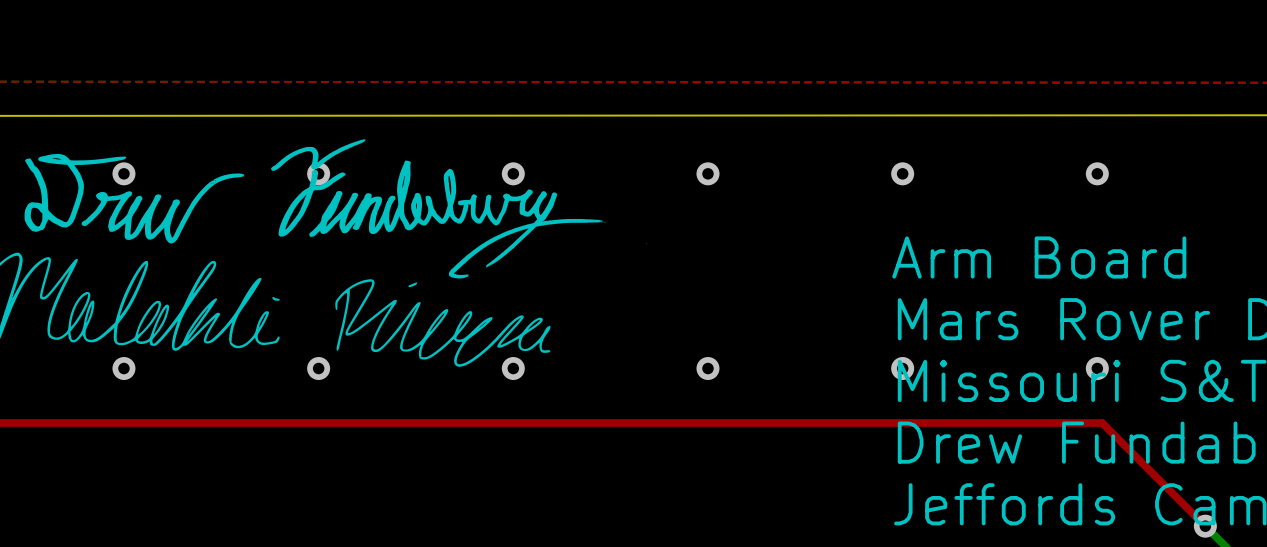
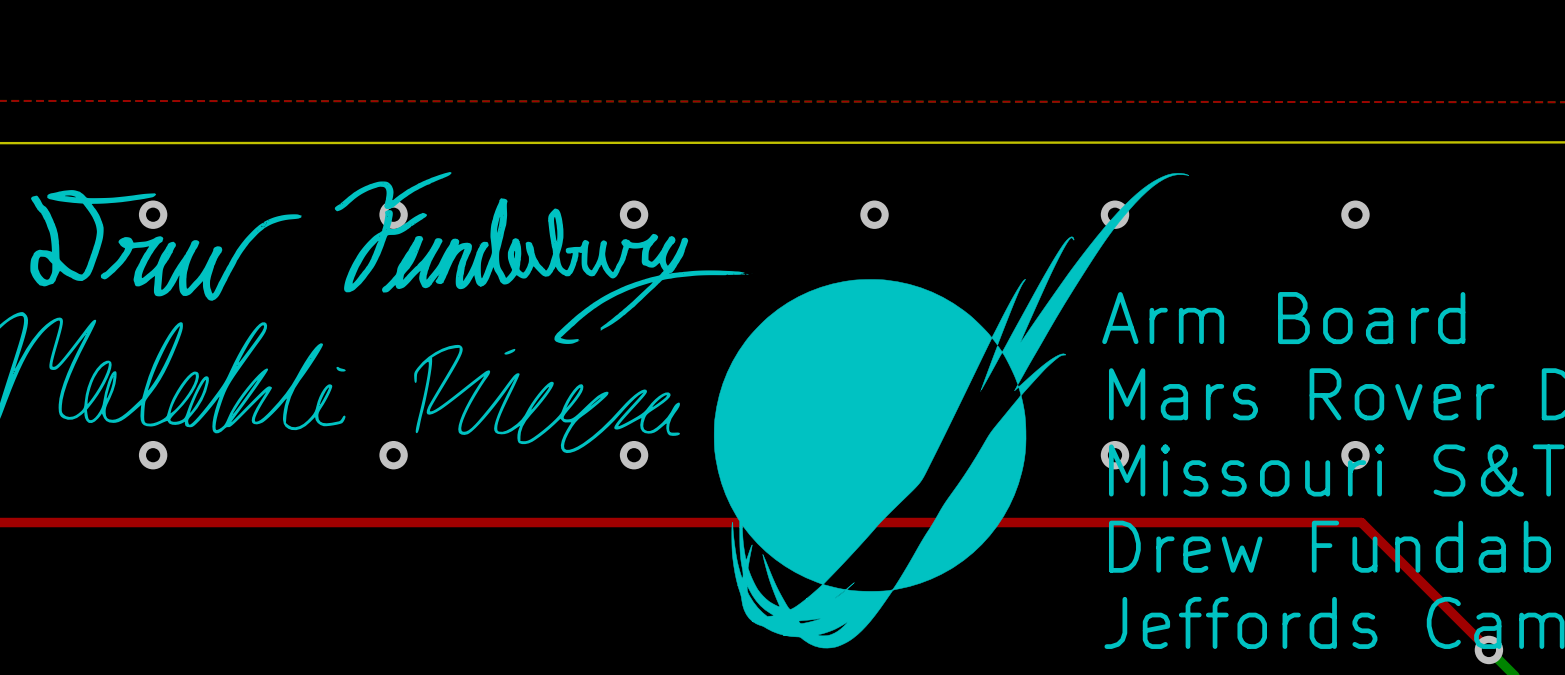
drawing: none -> [713, 173, 1190, 649]

